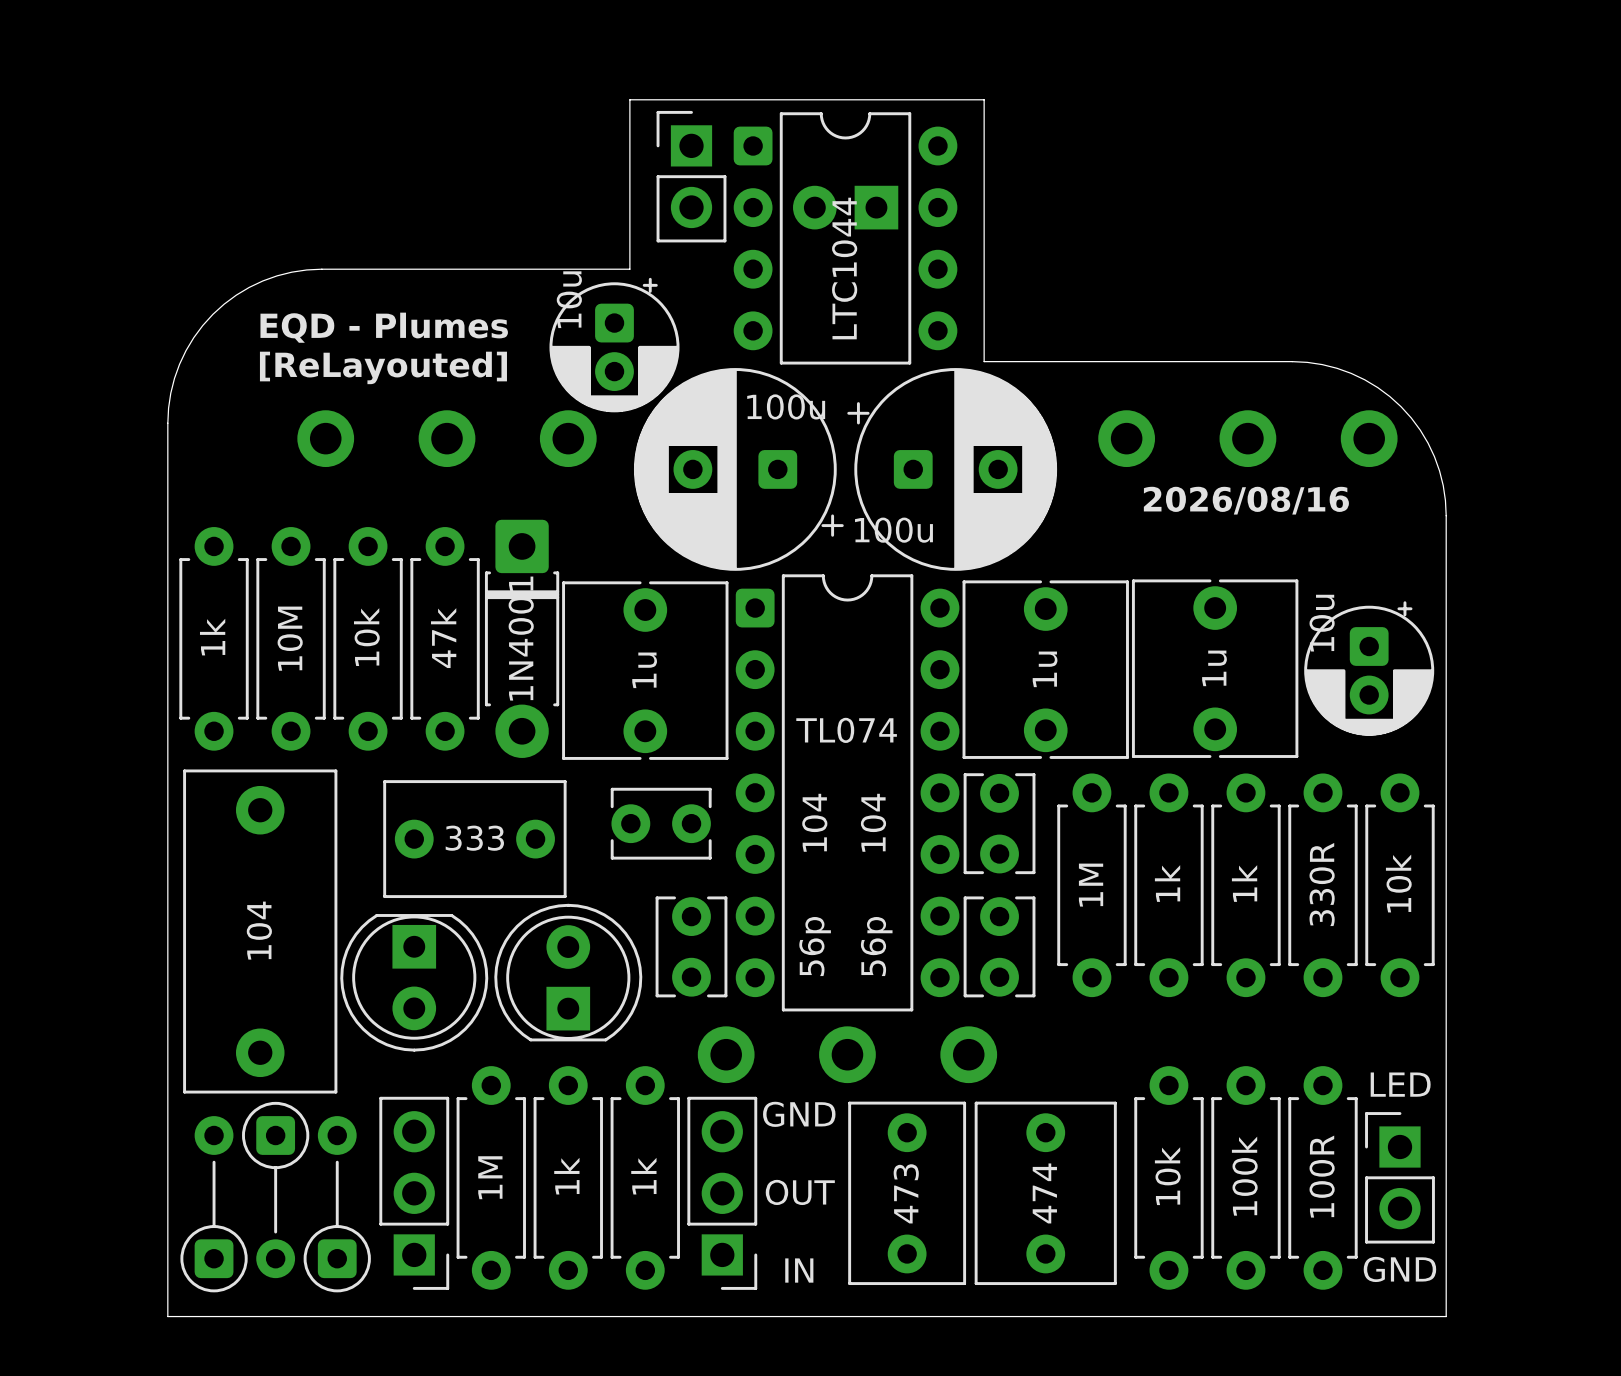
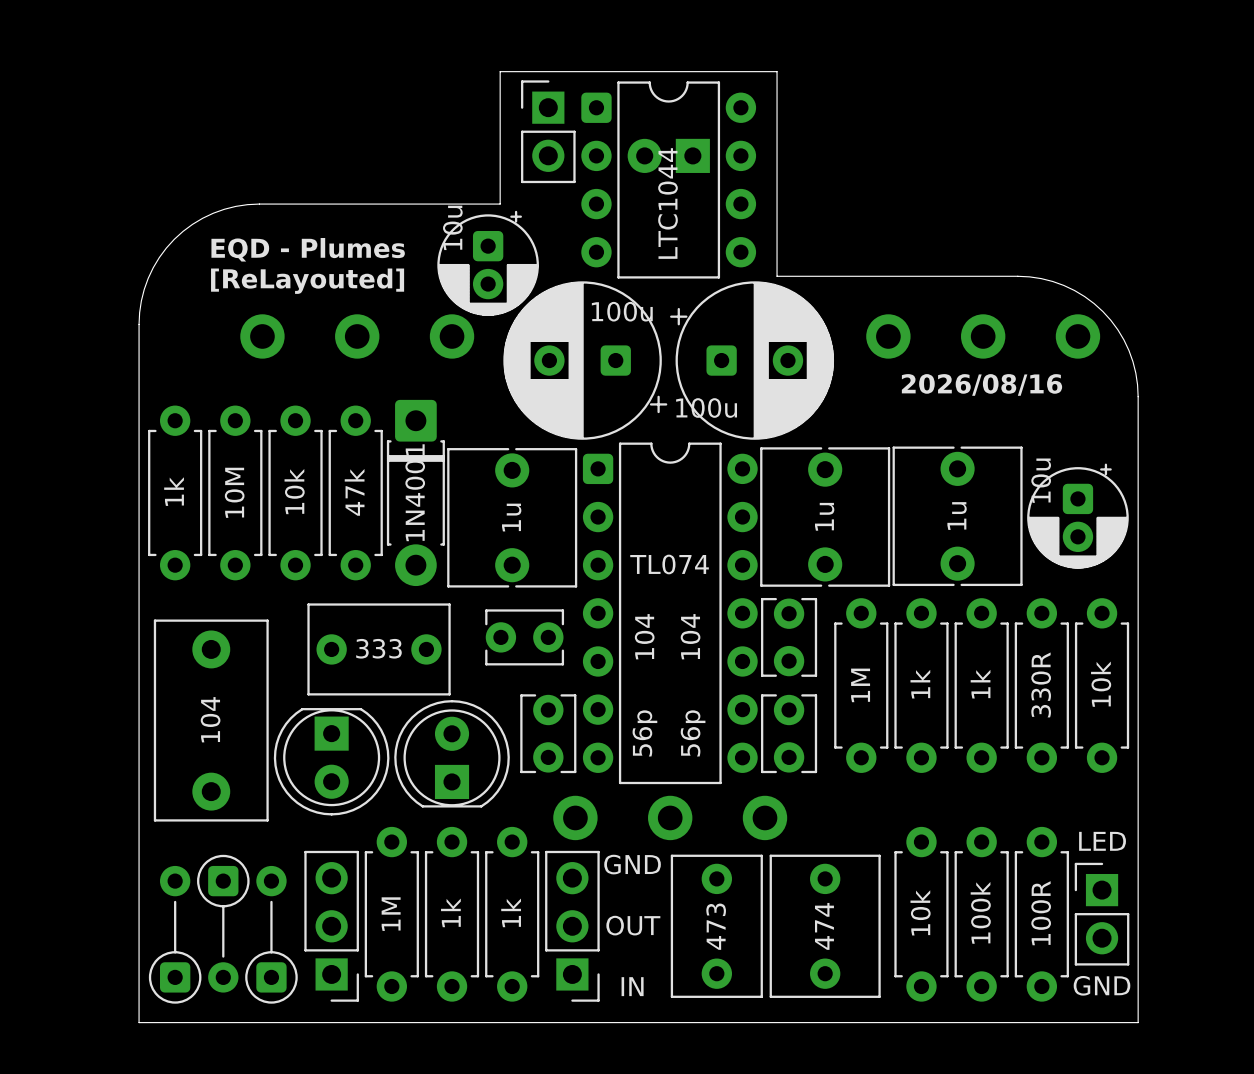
part footprint: [183, 769, 338, 1094] -> [153, 619, 269, 822]

